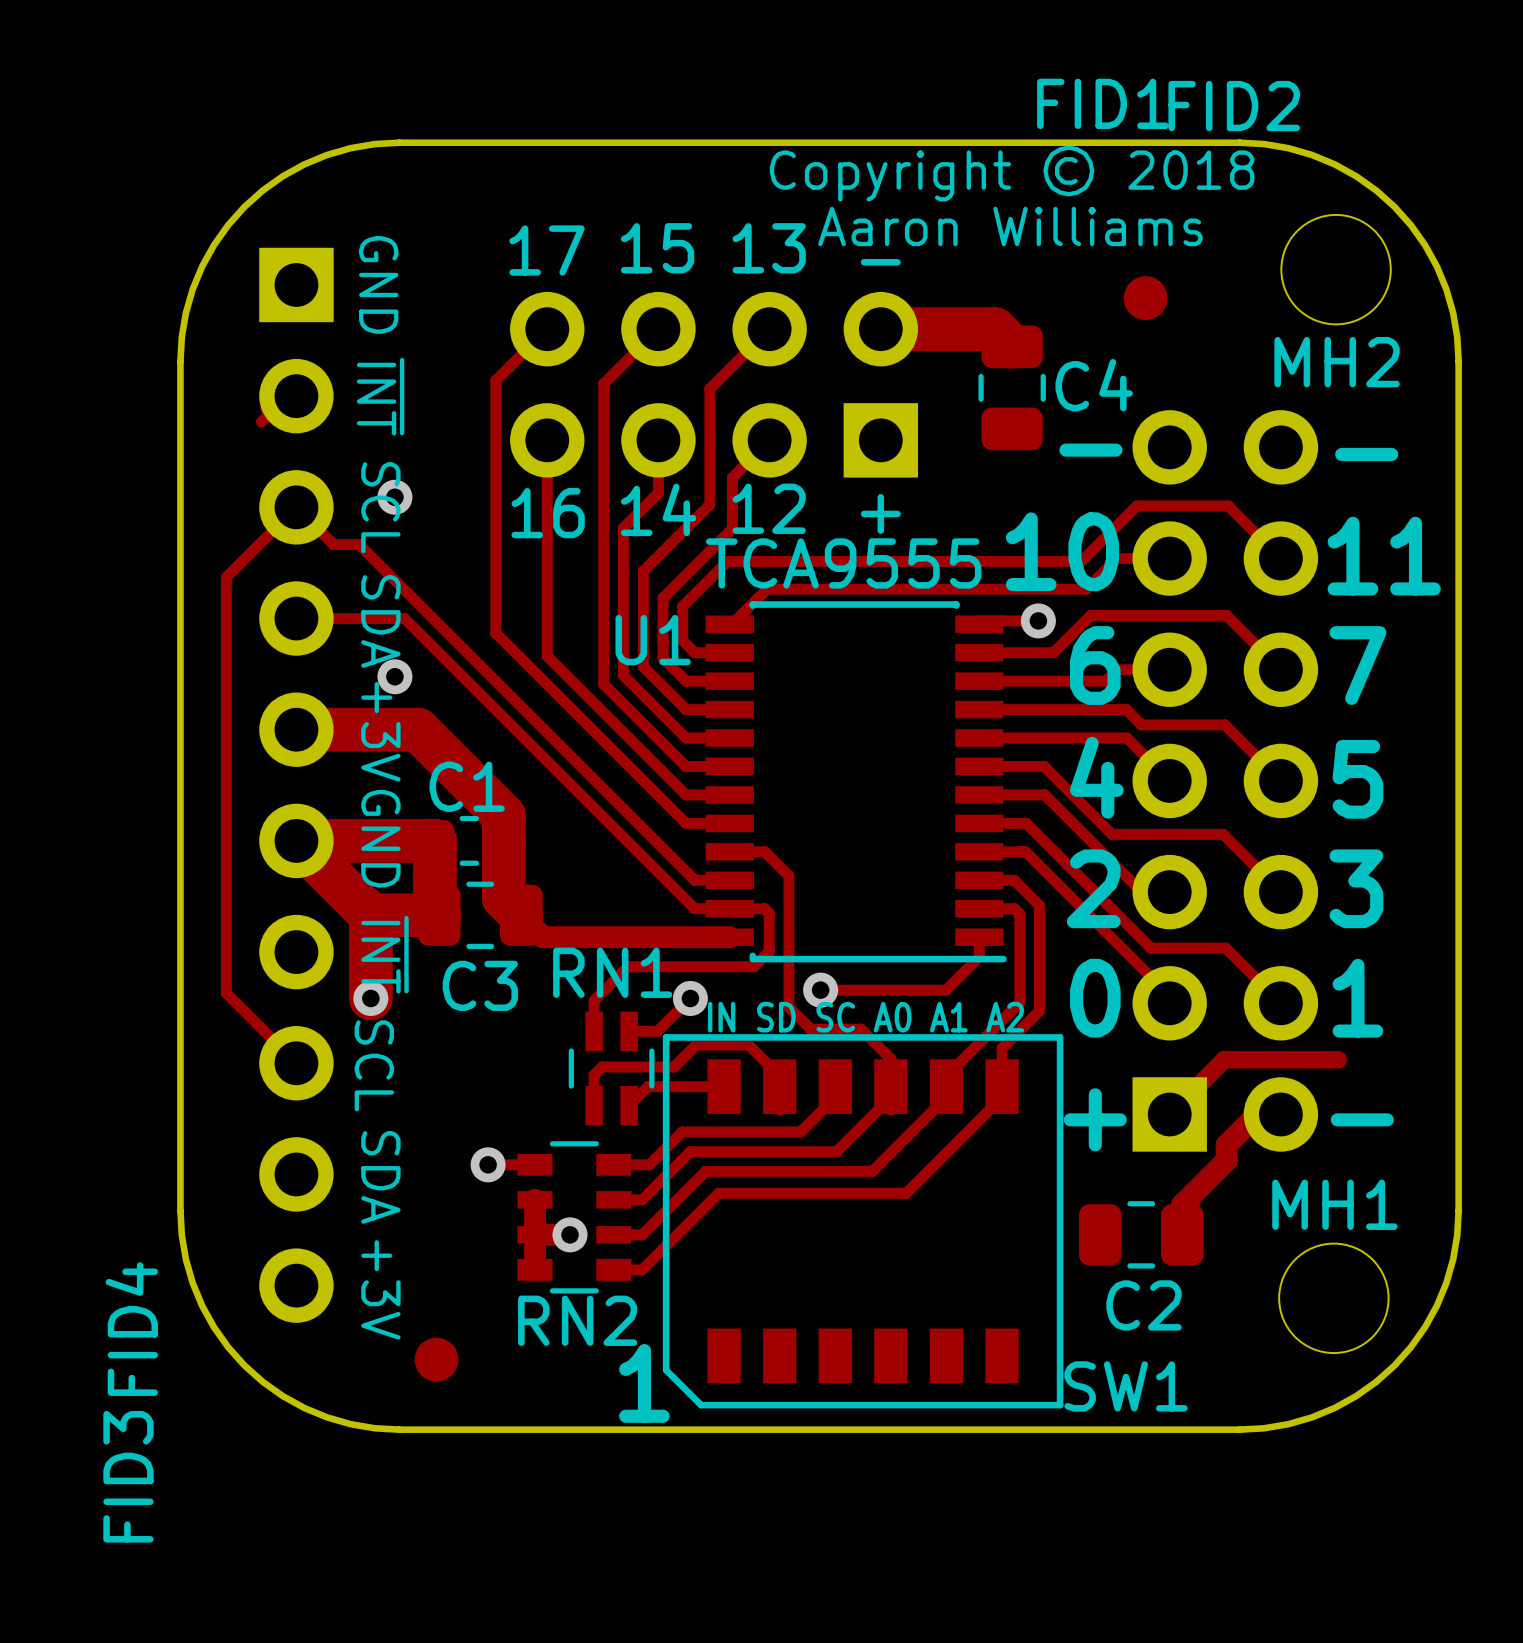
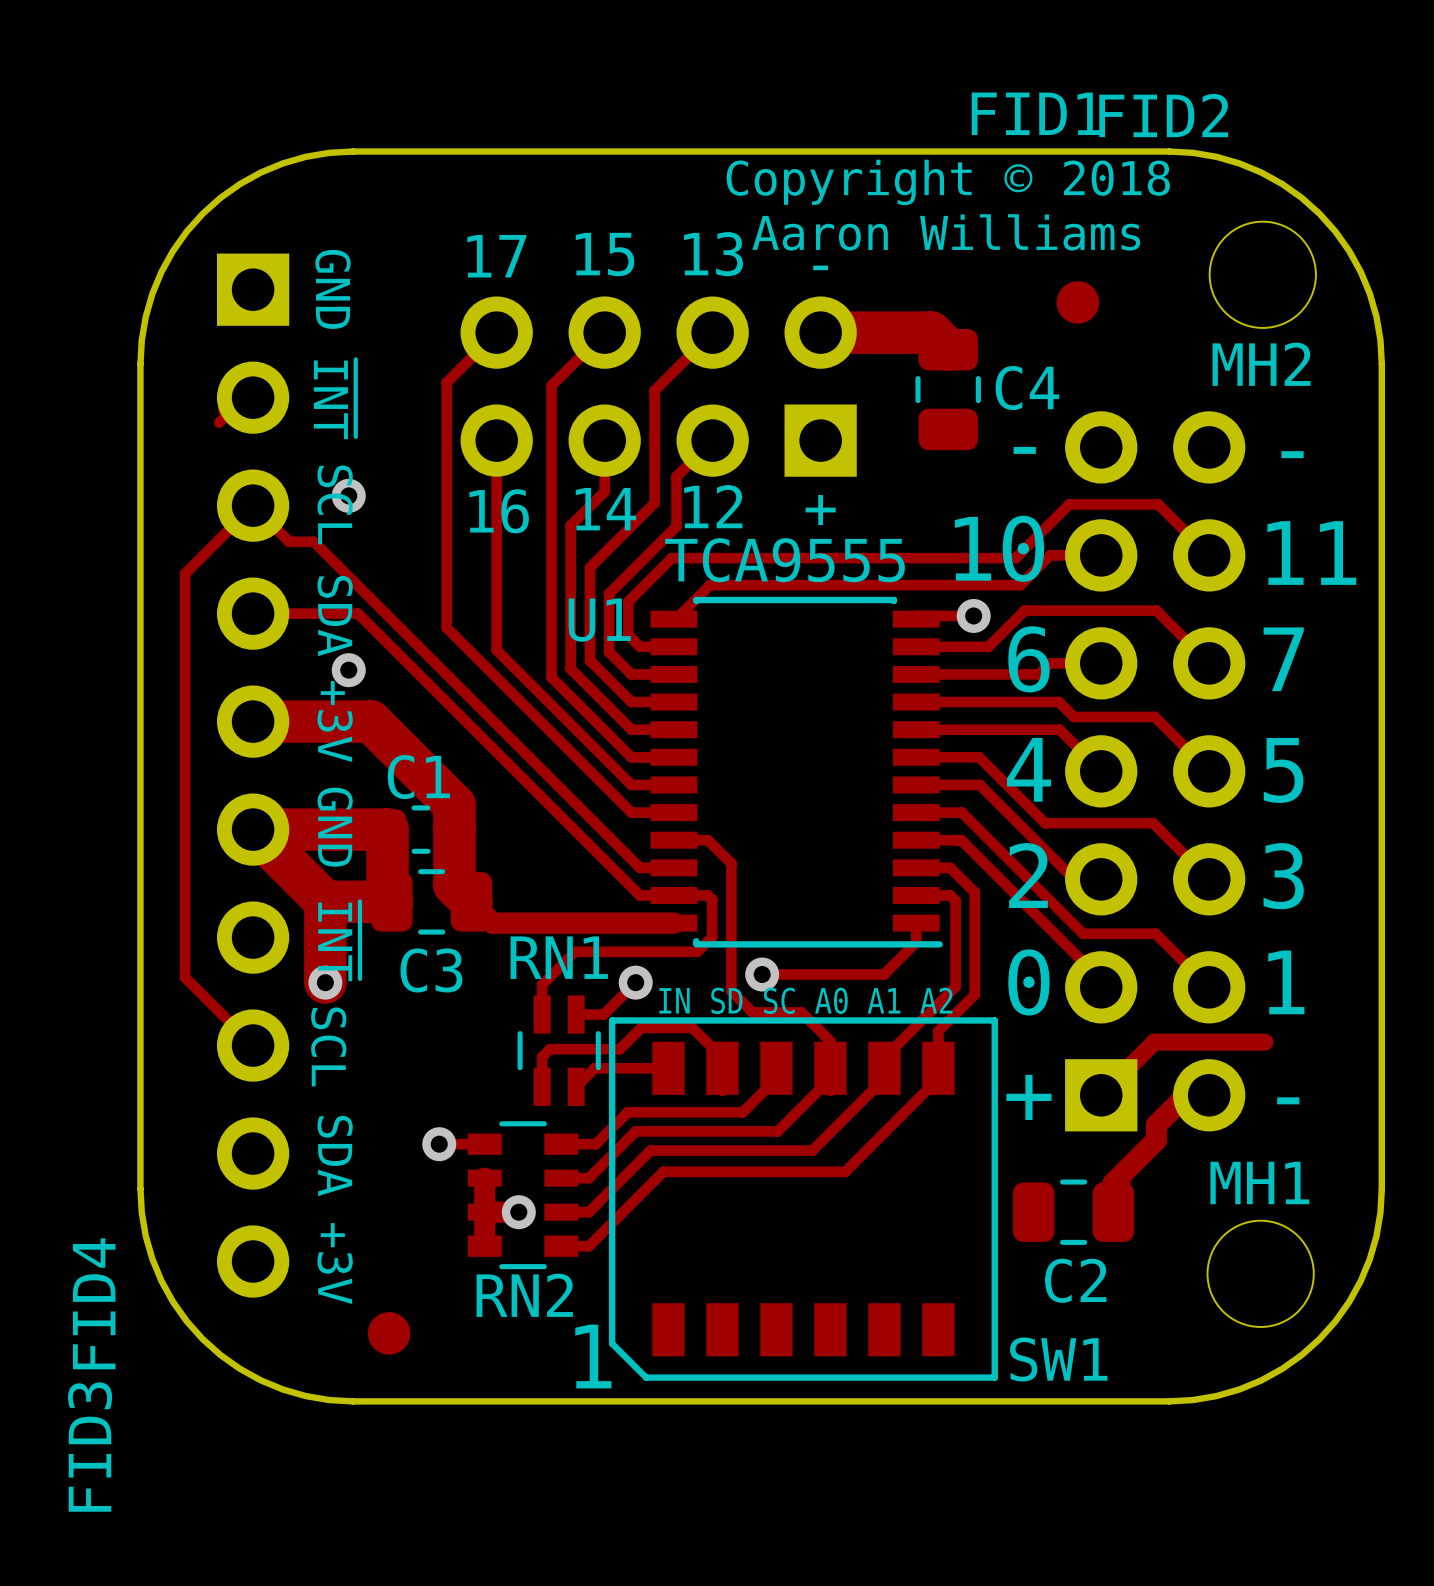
U1 name position: U1 (653, 640) -> U1 (599, 620)

